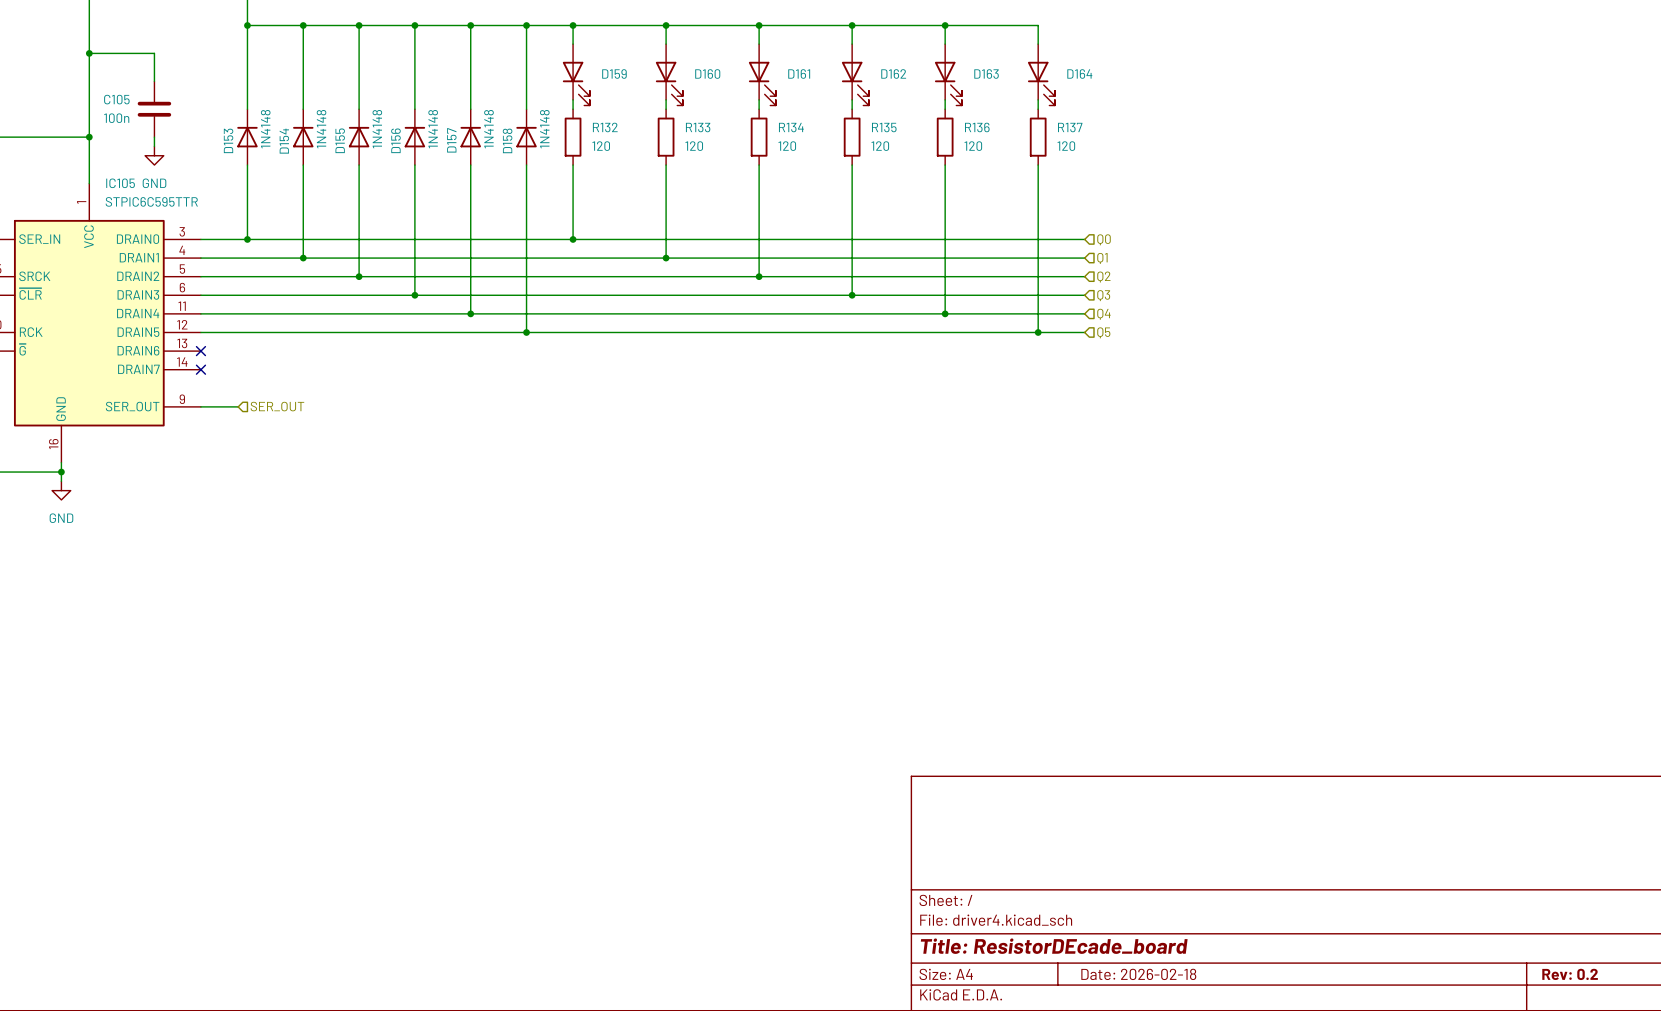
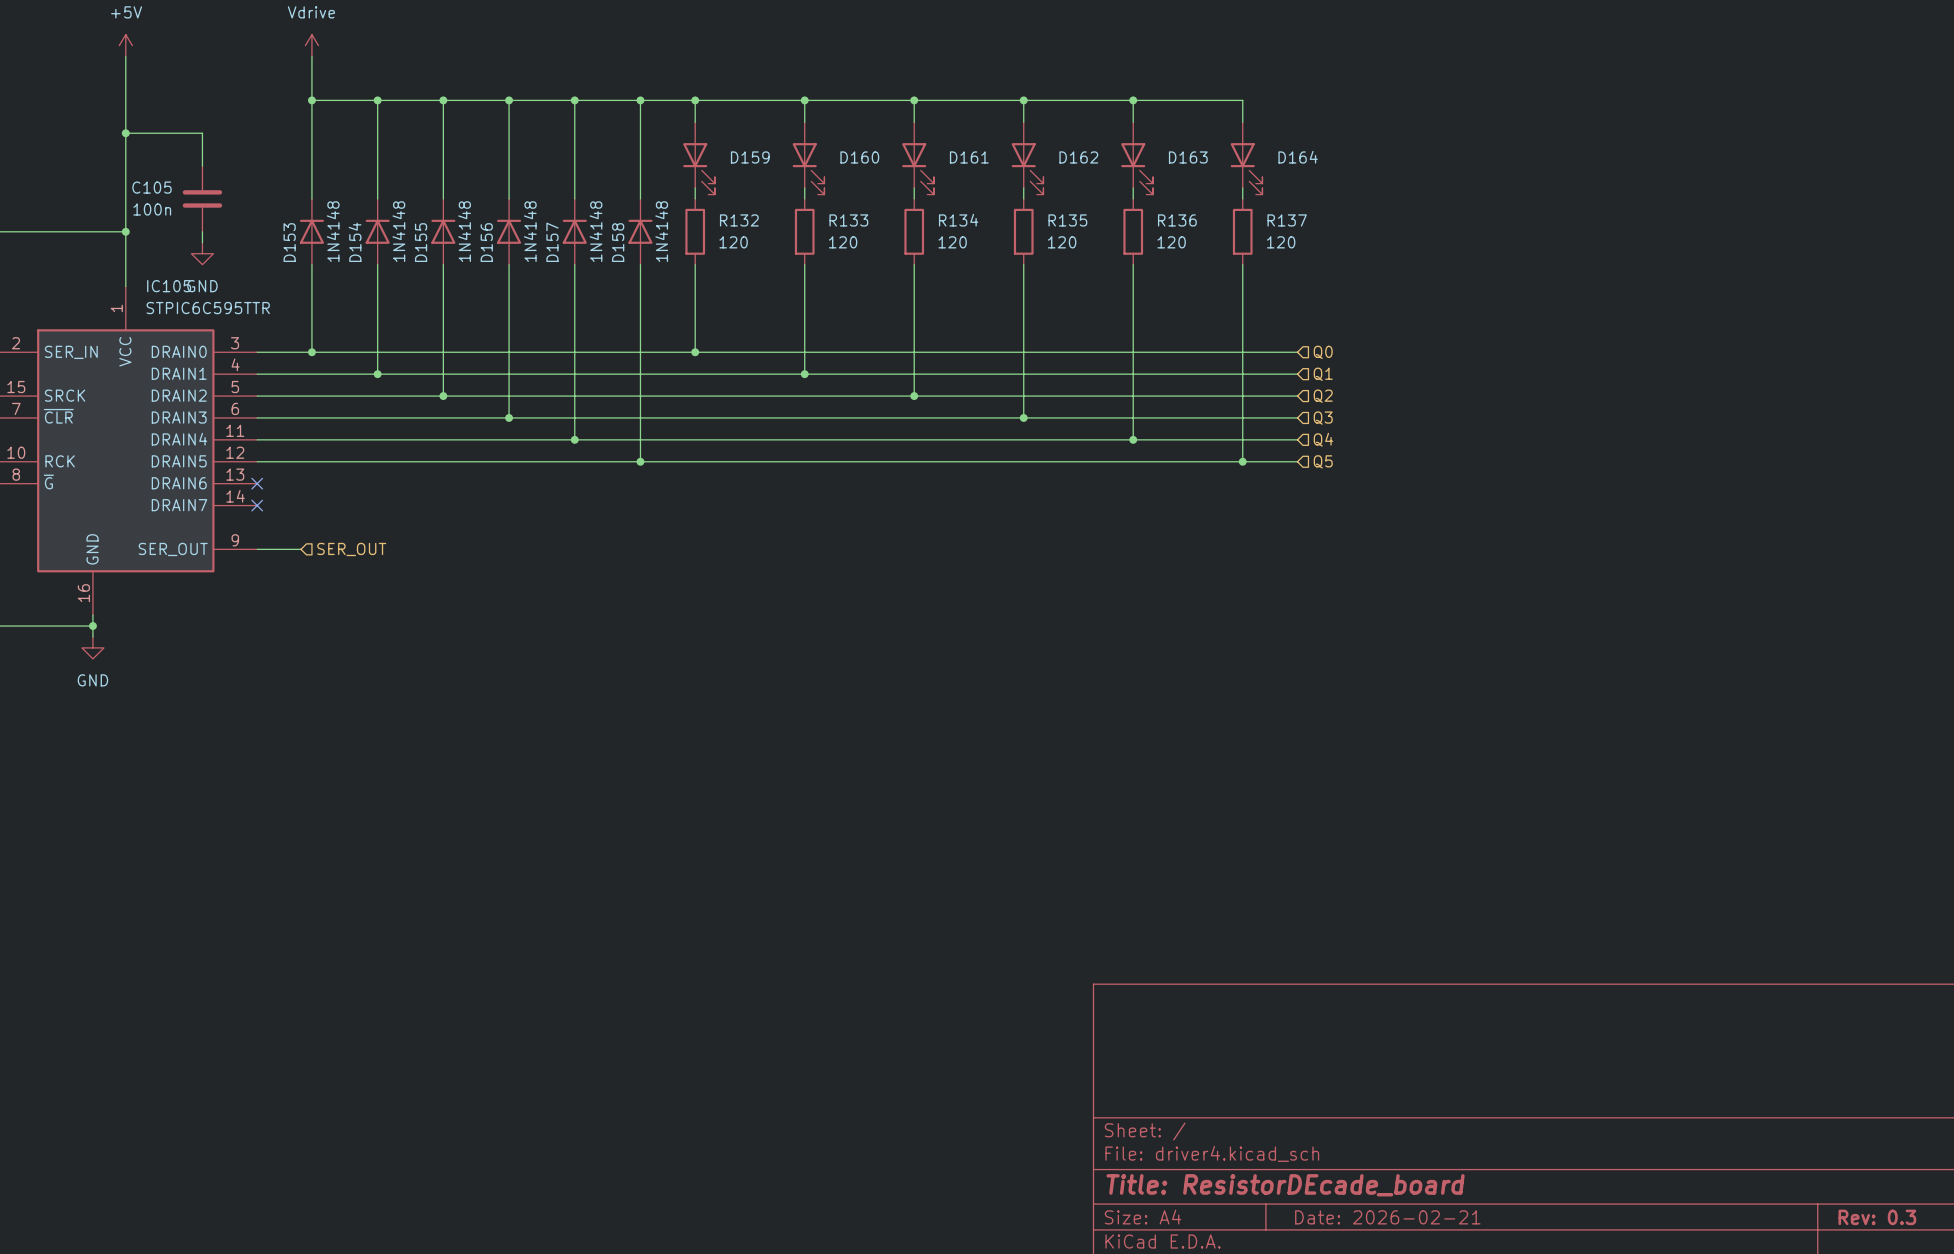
title block: Date: 2026-02-18 (1138, 974) -> Date: 2026-02-21 (1387, 1217)
title block: Rev: 0.2 (1570, 974) -> Rev: 0.3 (1877, 1217)

